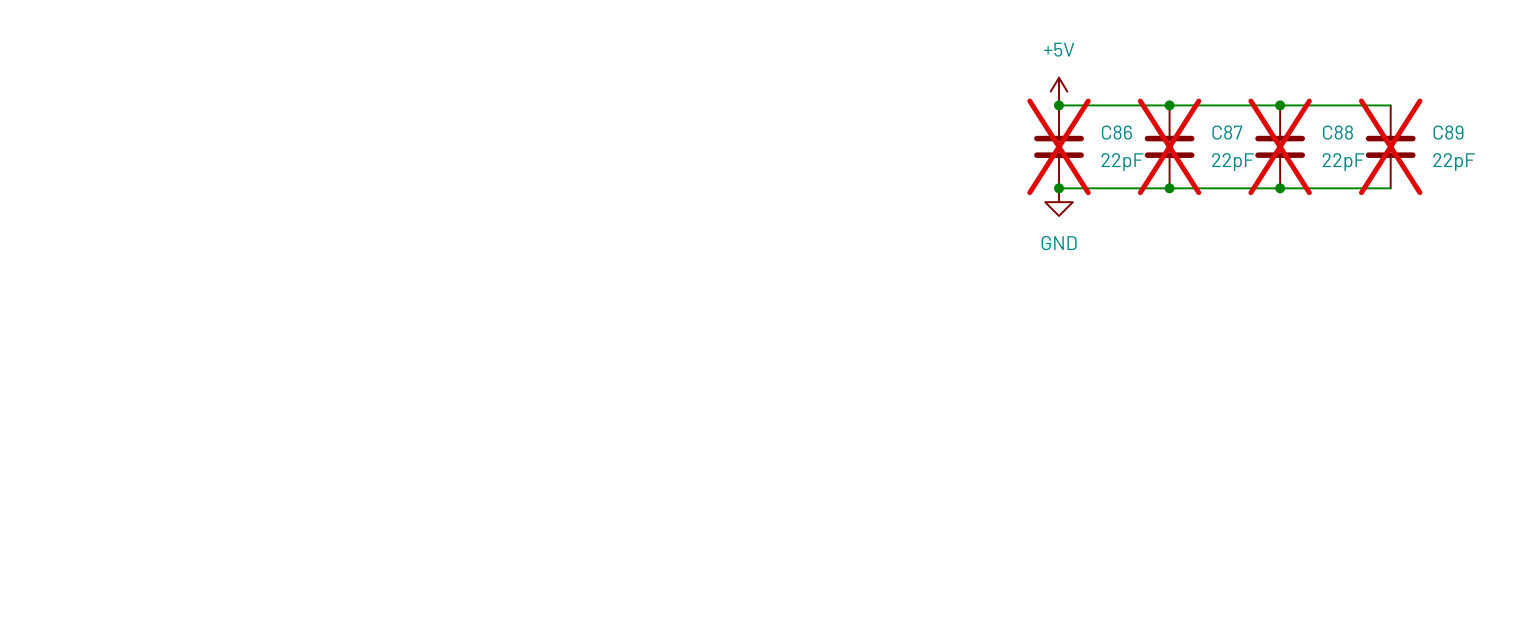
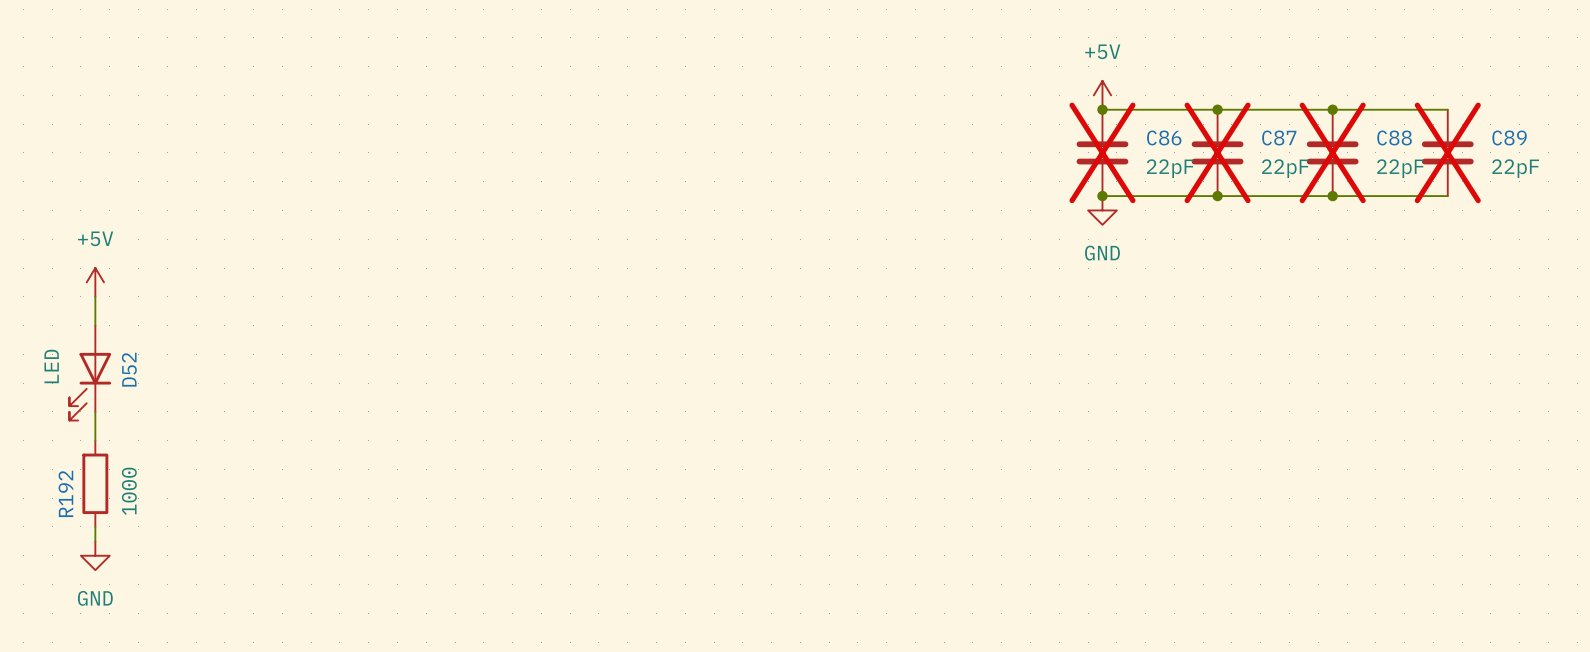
power symbol: none -> +5V (95, 282)
wire: none -> (95, 296) (95, 325)
D52: none -> LED (90, 373)
wire: none -> (95, 411) (95, 440)
R192: none -> 1000 (95, 483)
wire: none -> (95, 526) (95, 541)
power symbol: none -> GND (95, 555)

